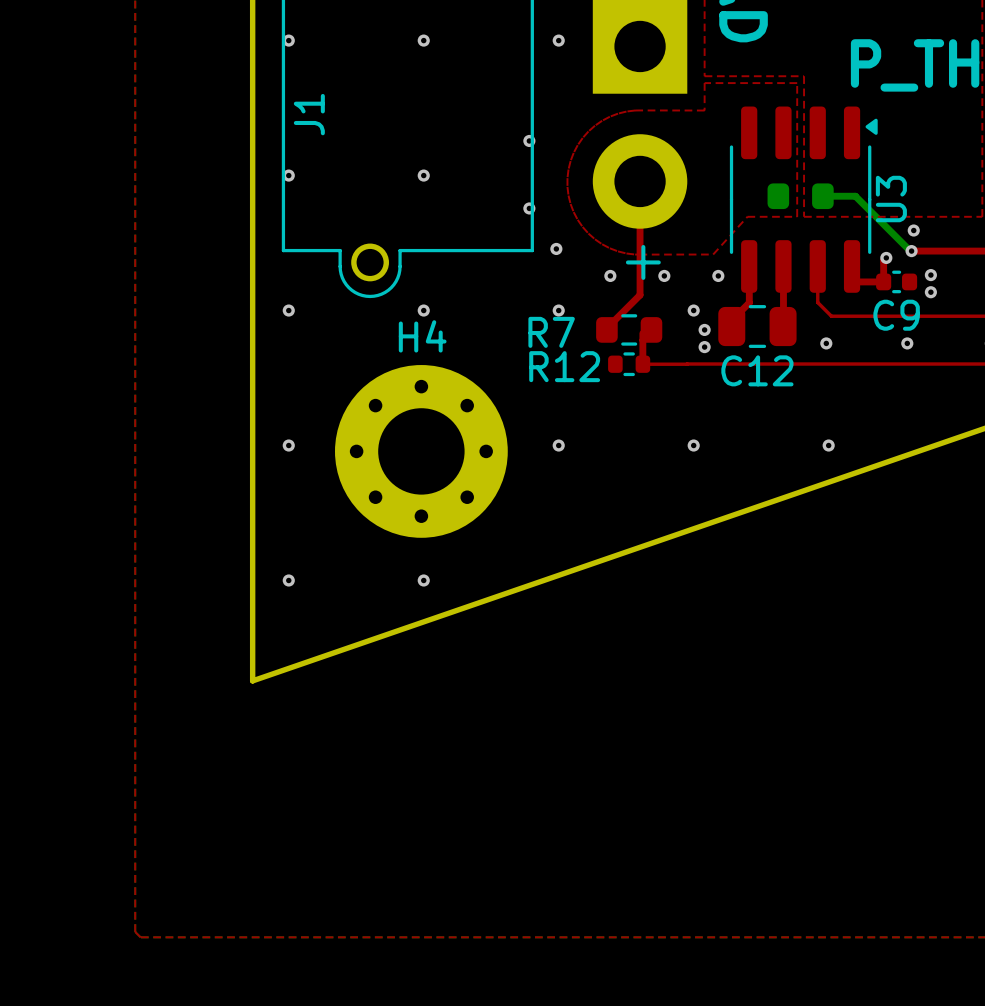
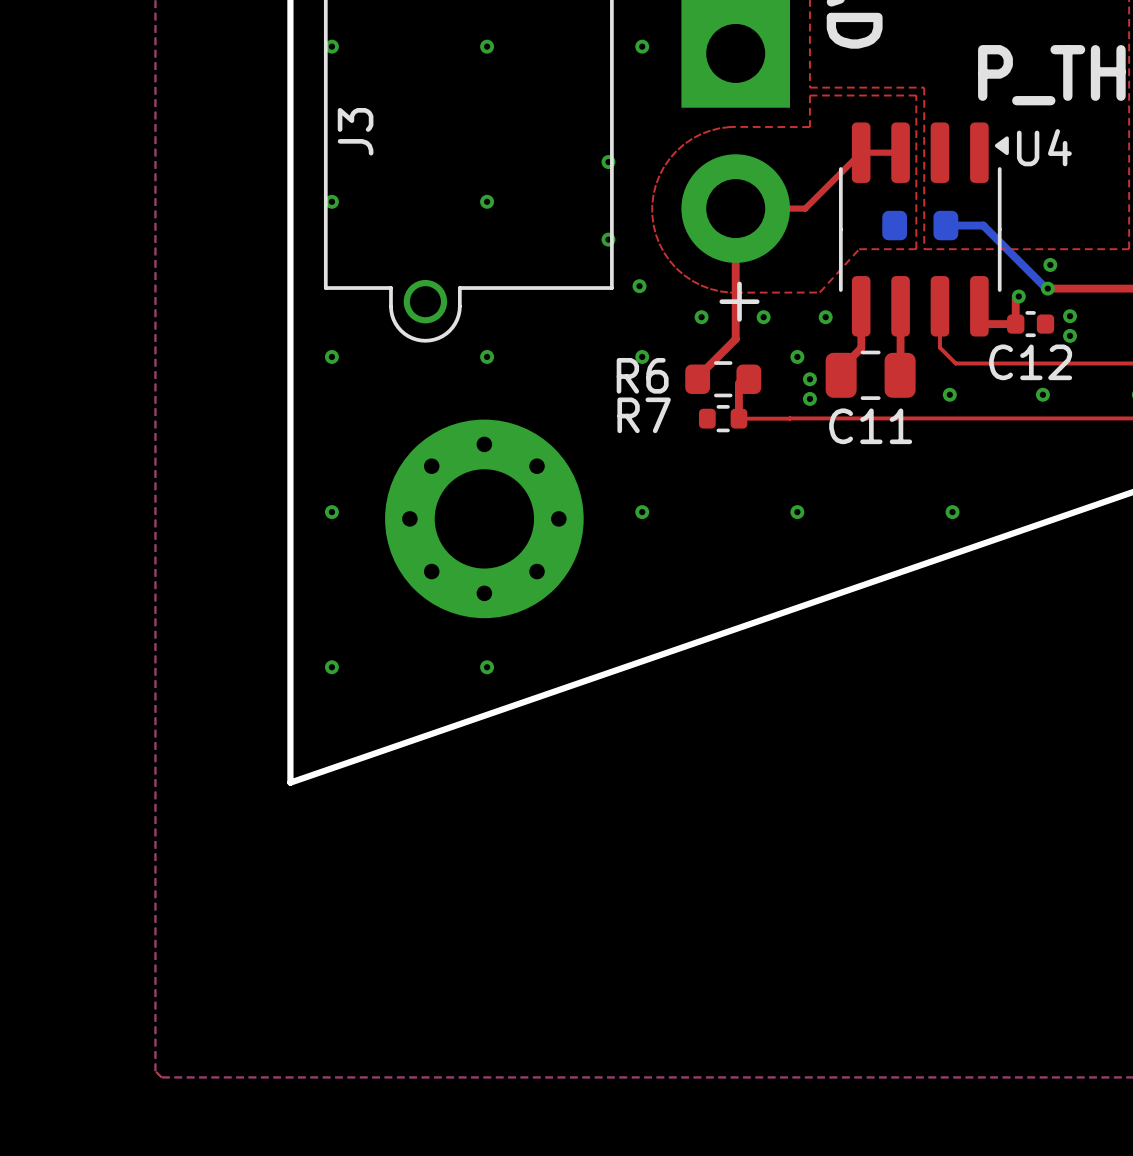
J1 name: J1 (309, 114) -> J3 (355, 131)
top track: none -> (900, 152) (861, 152) (805, 208) (735, 208)
U3 name: U3 (891, 199) -> U4 (1044, 147)
C9 name: C9 (896, 315) -> C12 (1030, 362)
R7 name: R7 (551, 332) -> R6 (642, 375)
H4 name: H4 (422, 336) -> none
R12 name: R12 (564, 366) -> R7 (644, 415)
C12 name: C12 (757, 370) -> C11 (870, 426)

